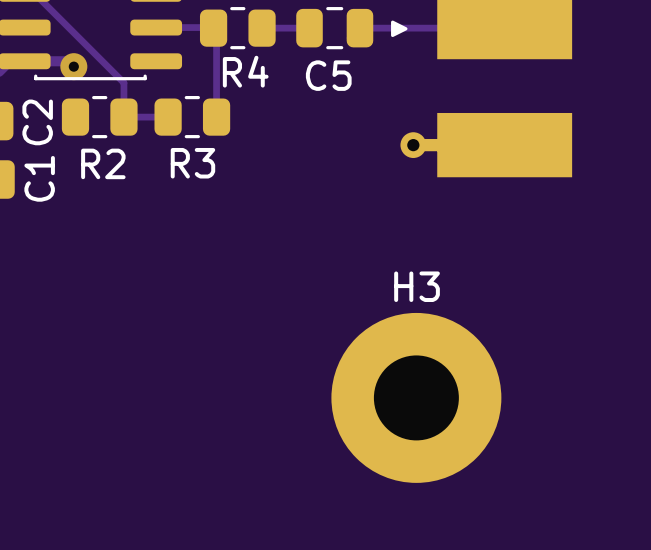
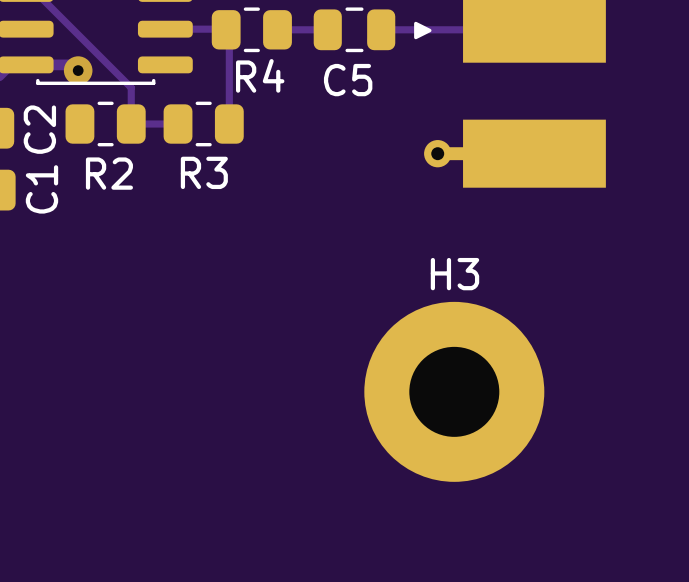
H3 position: (416, 397) -> (454, 391)

